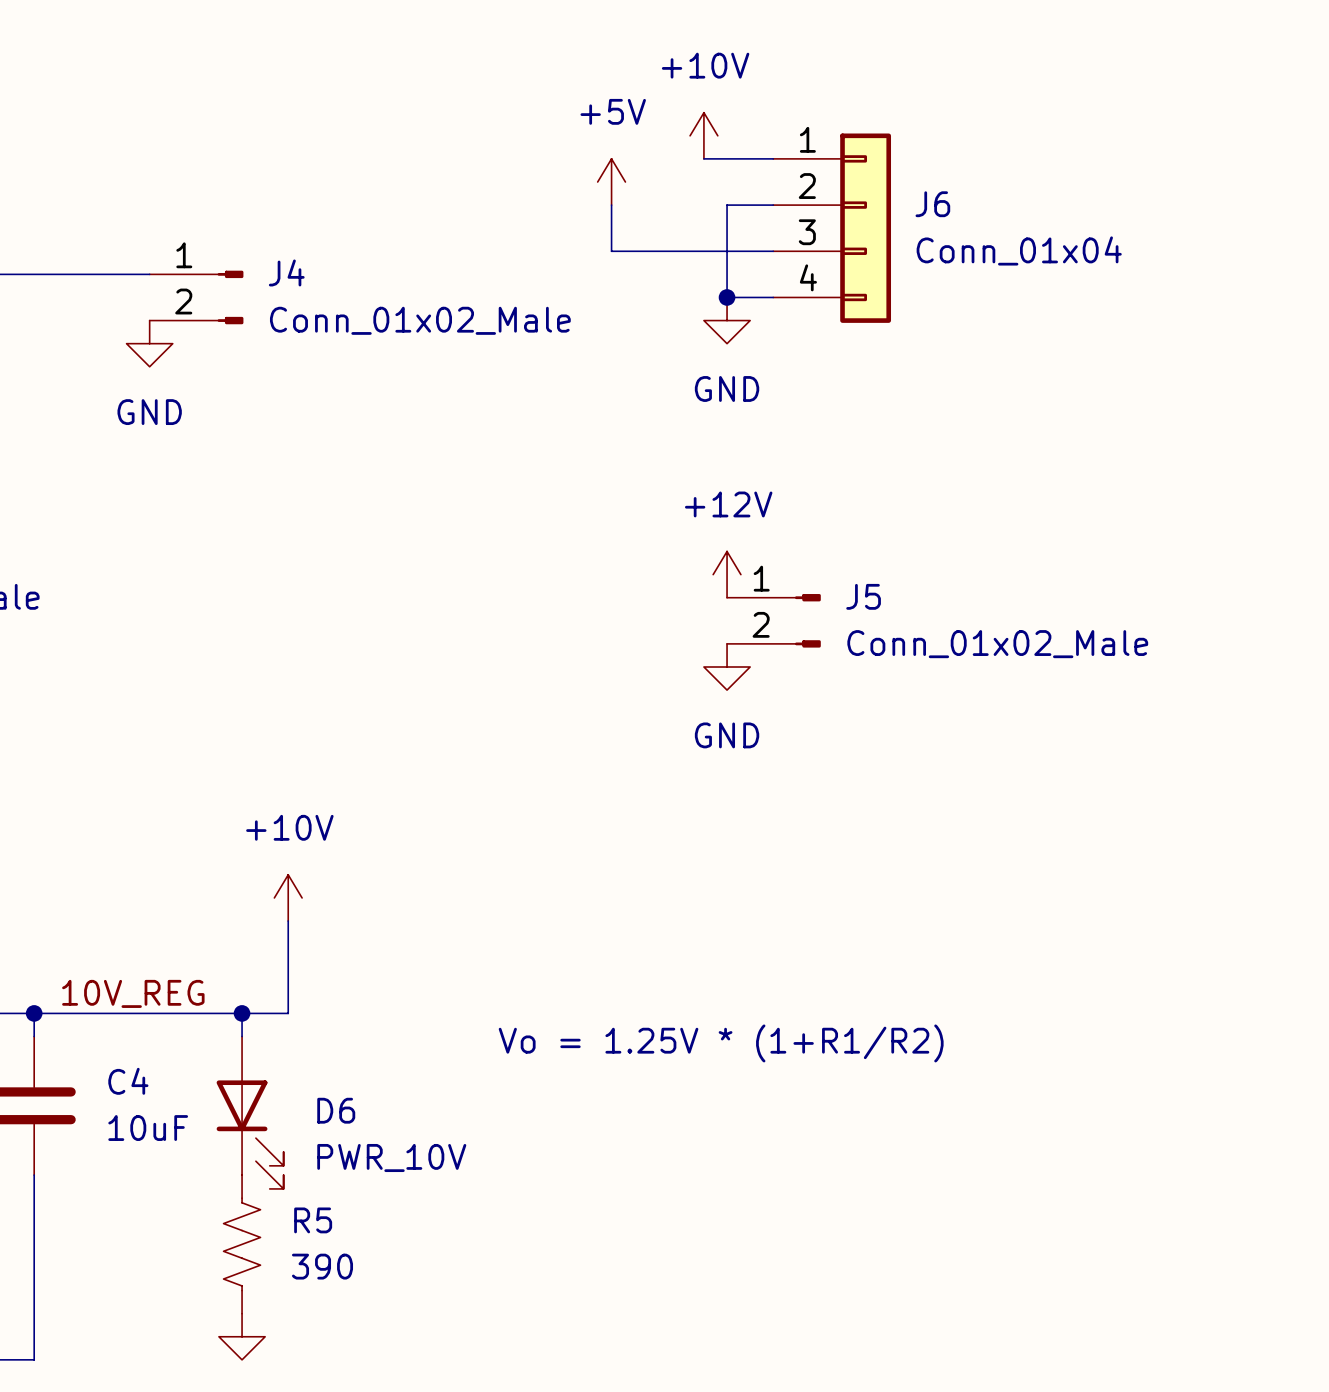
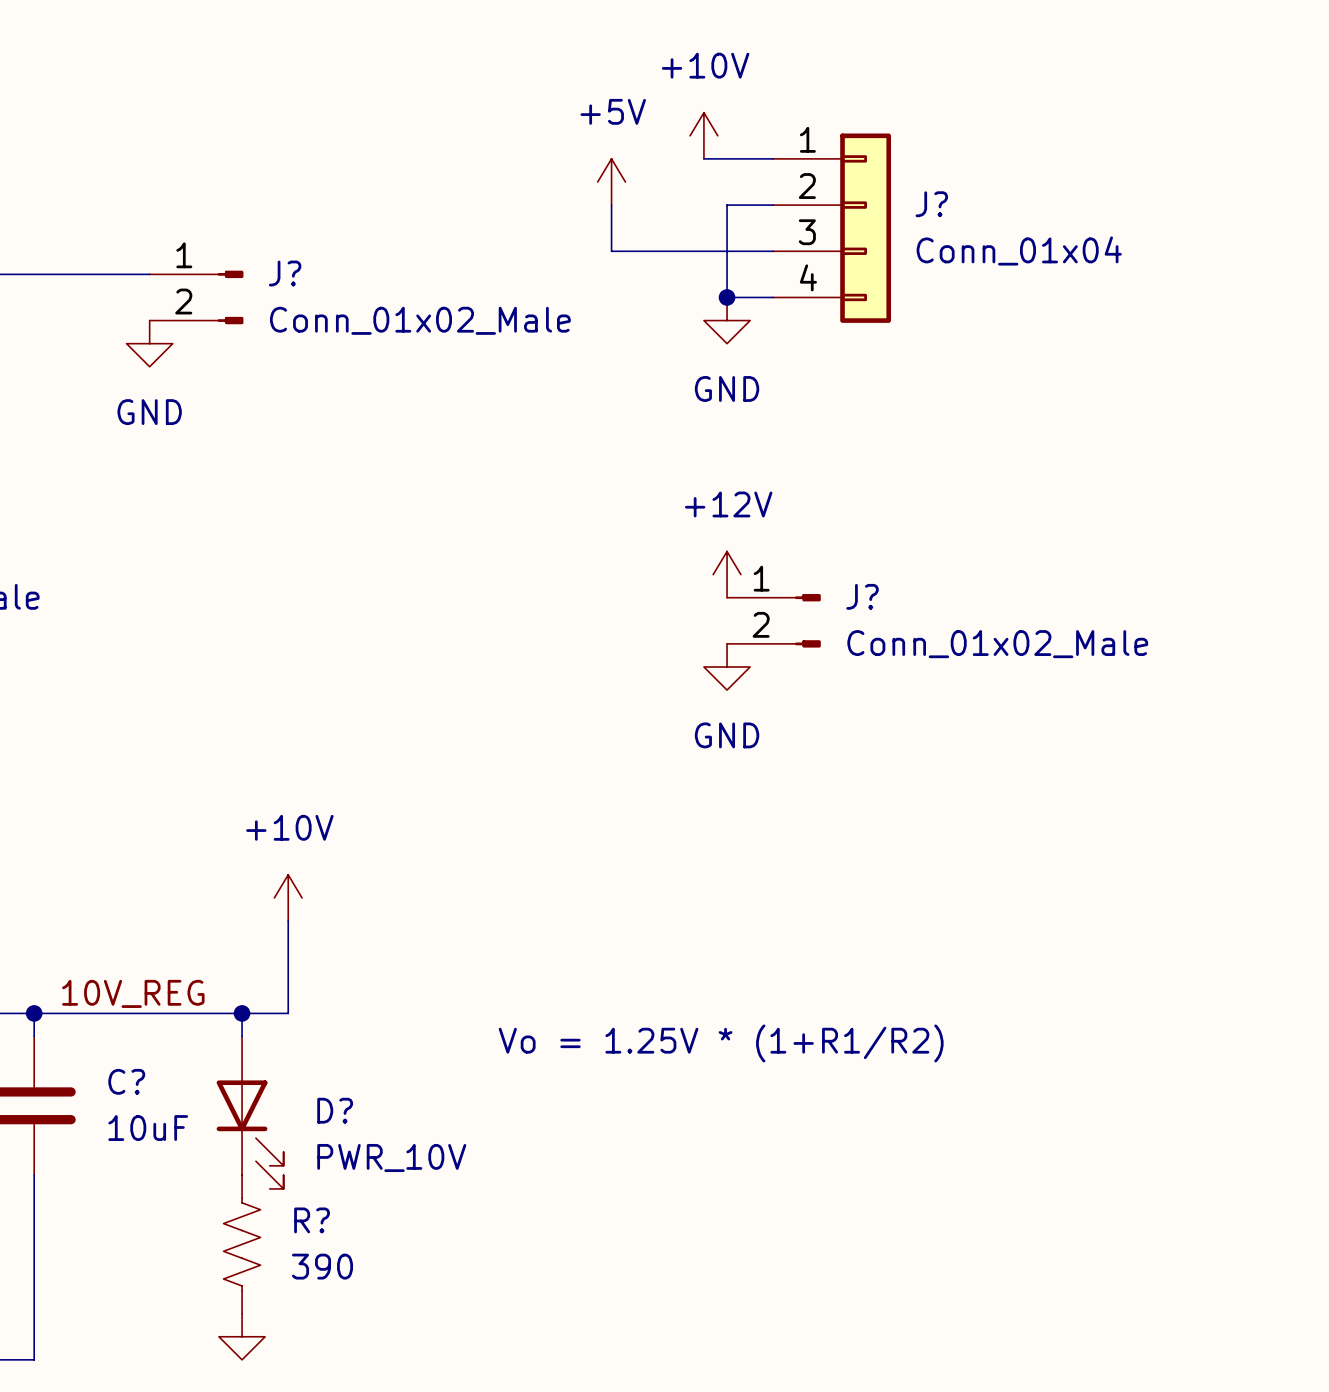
J6 name: J6 (932, 204) -> J? (931, 204)
J4 name: J4 (286, 272) -> J? (285, 273)
J5 name: J5 (863, 596) -> J? (862, 596)
C4 name: C4 (128, 1081) -> C? (126, 1081)
D6 name: D6 (336, 1110) -> D? (335, 1110)
R5 name: R5 (313, 1220) -> R? (312, 1220)

